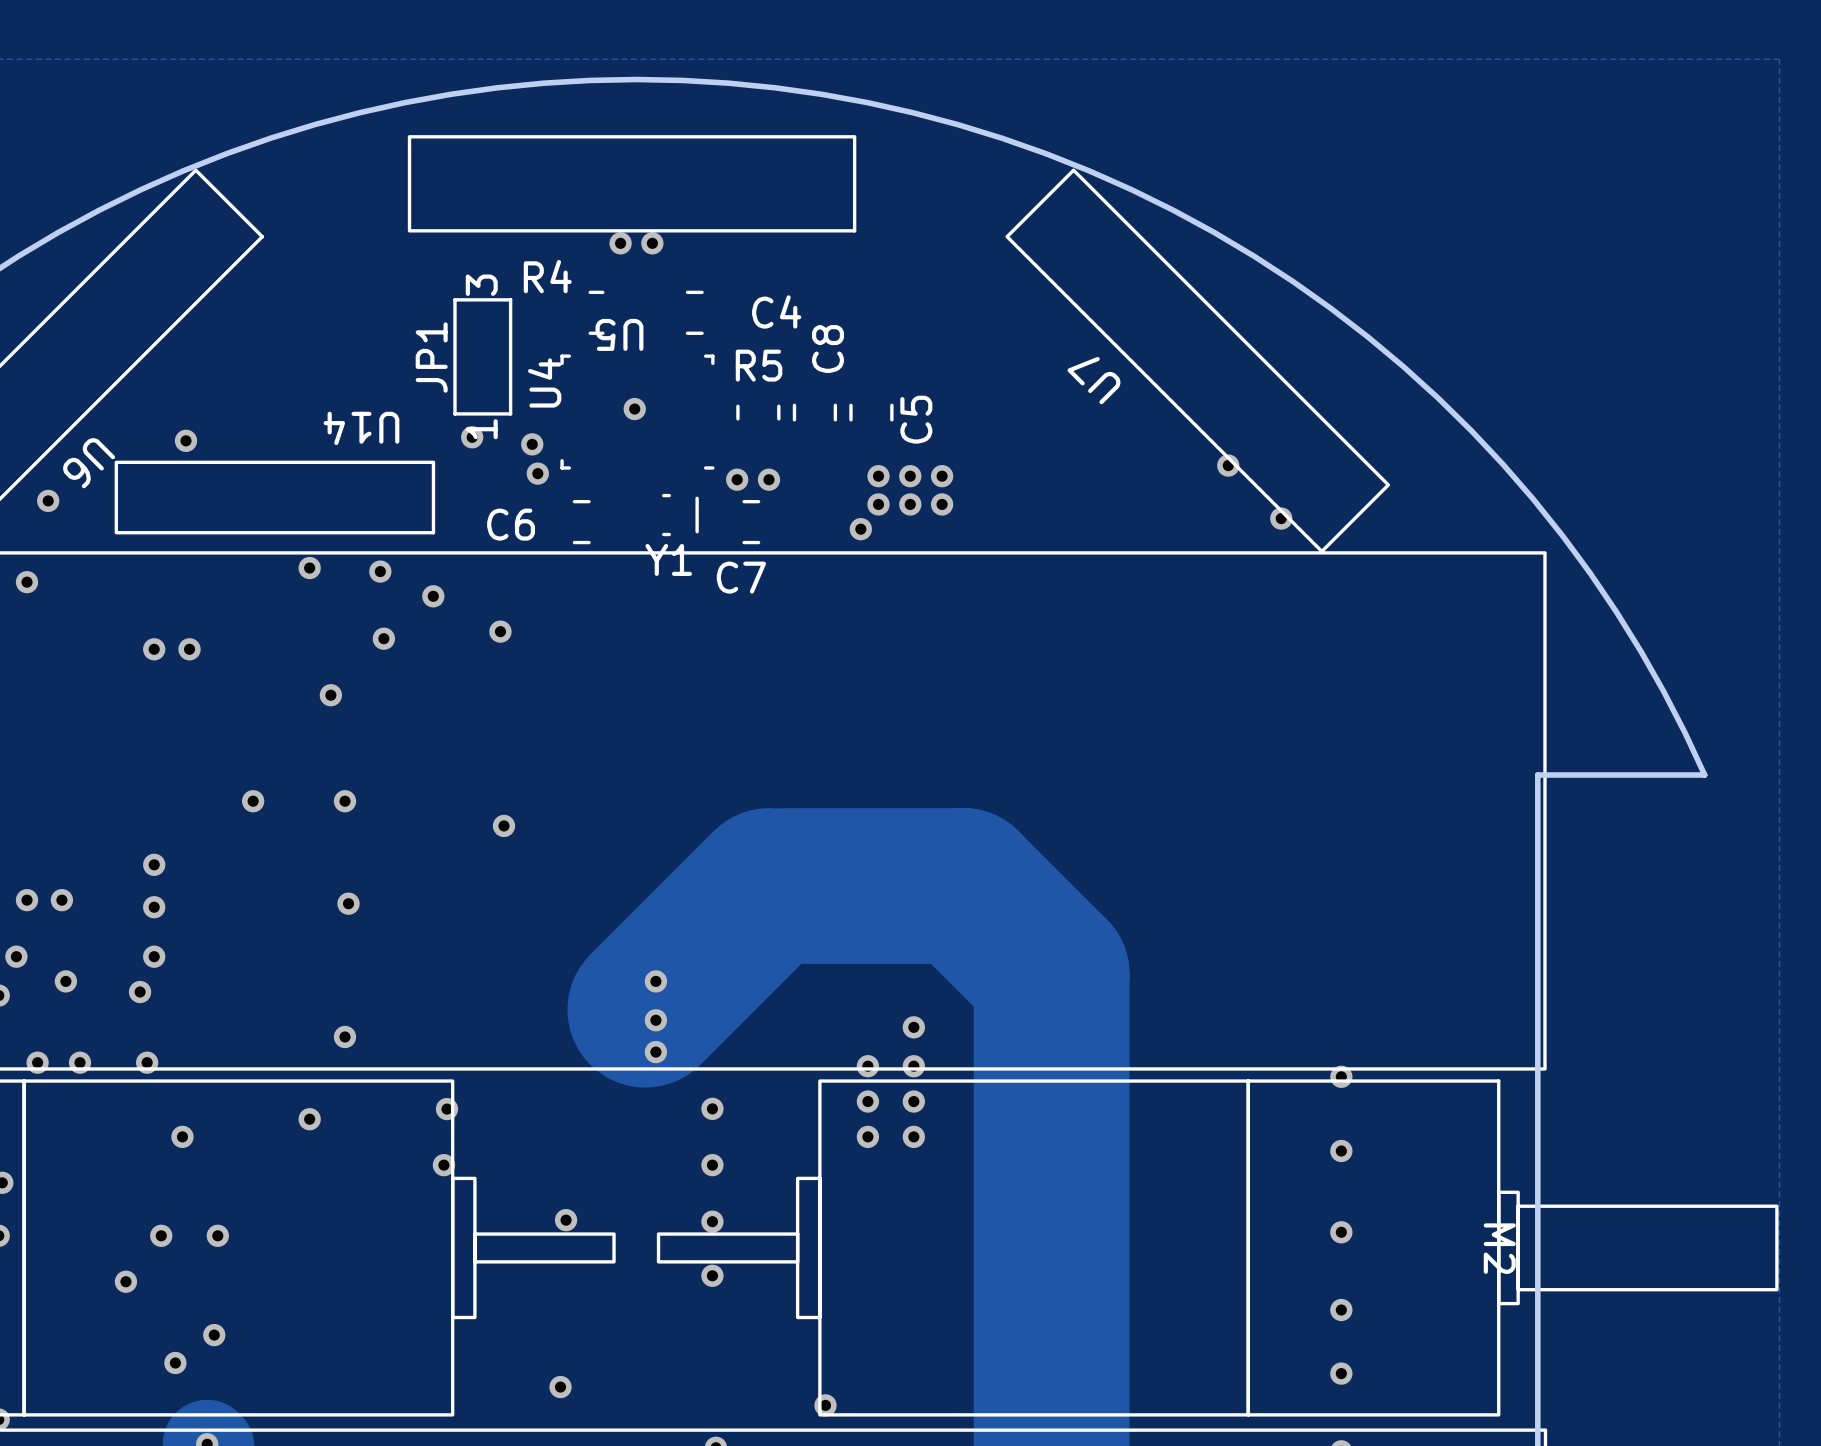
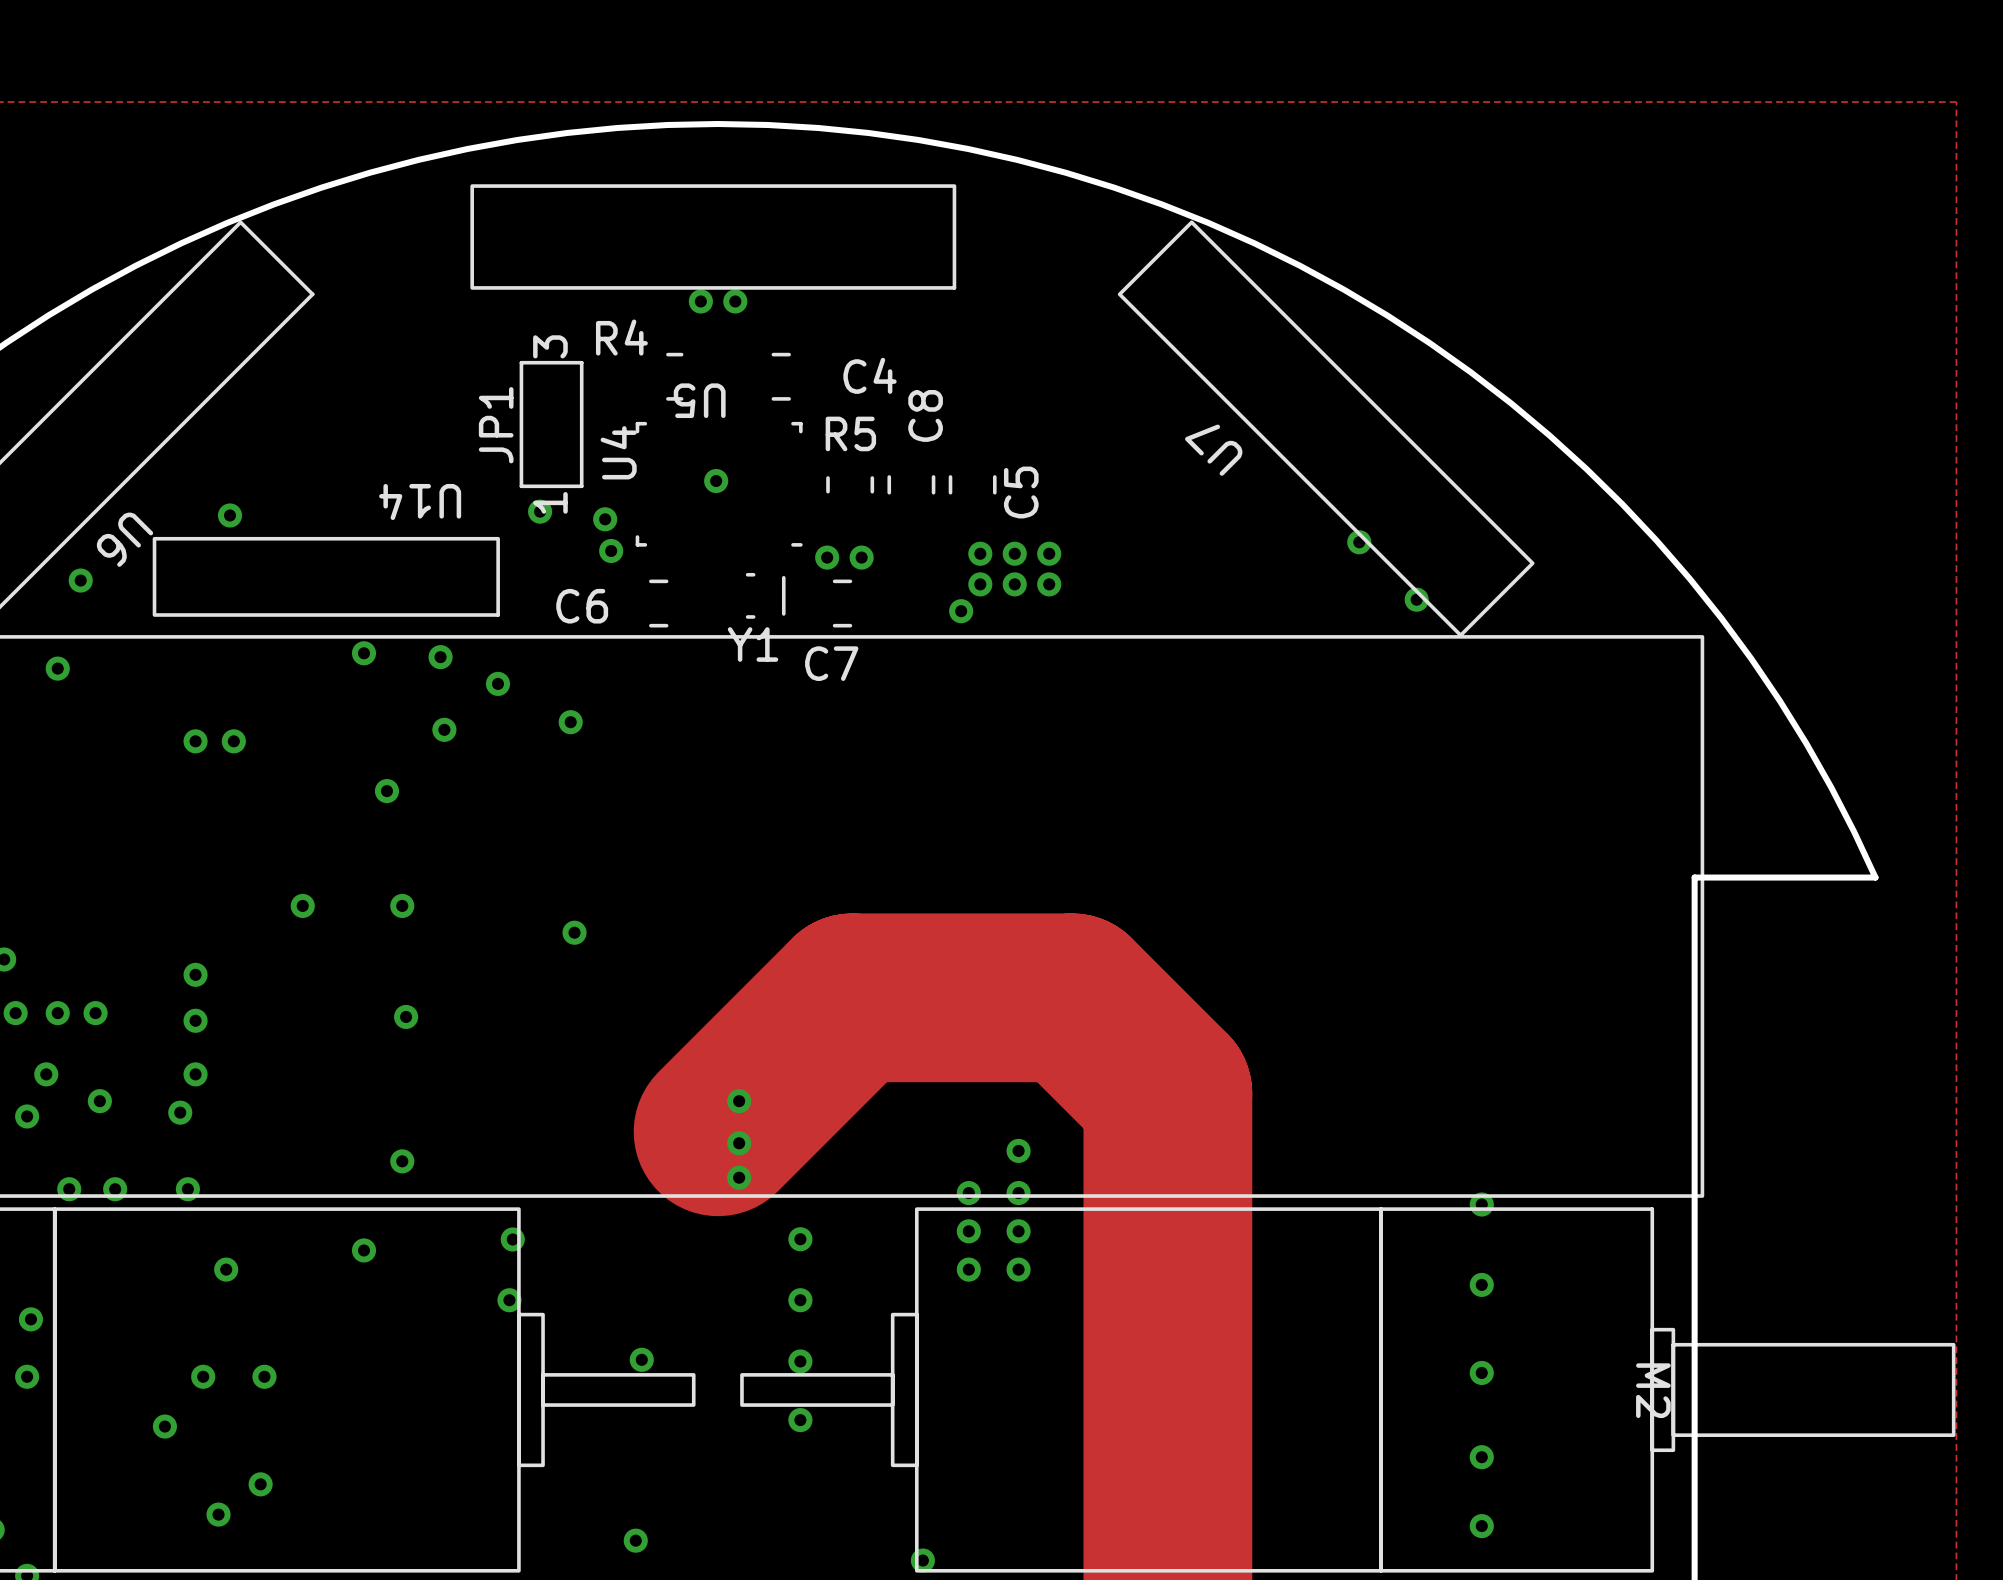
track: (768, 886) (645, 1009) -> none
track: none -> (880, 997) (852, 997) (718, 1131)

